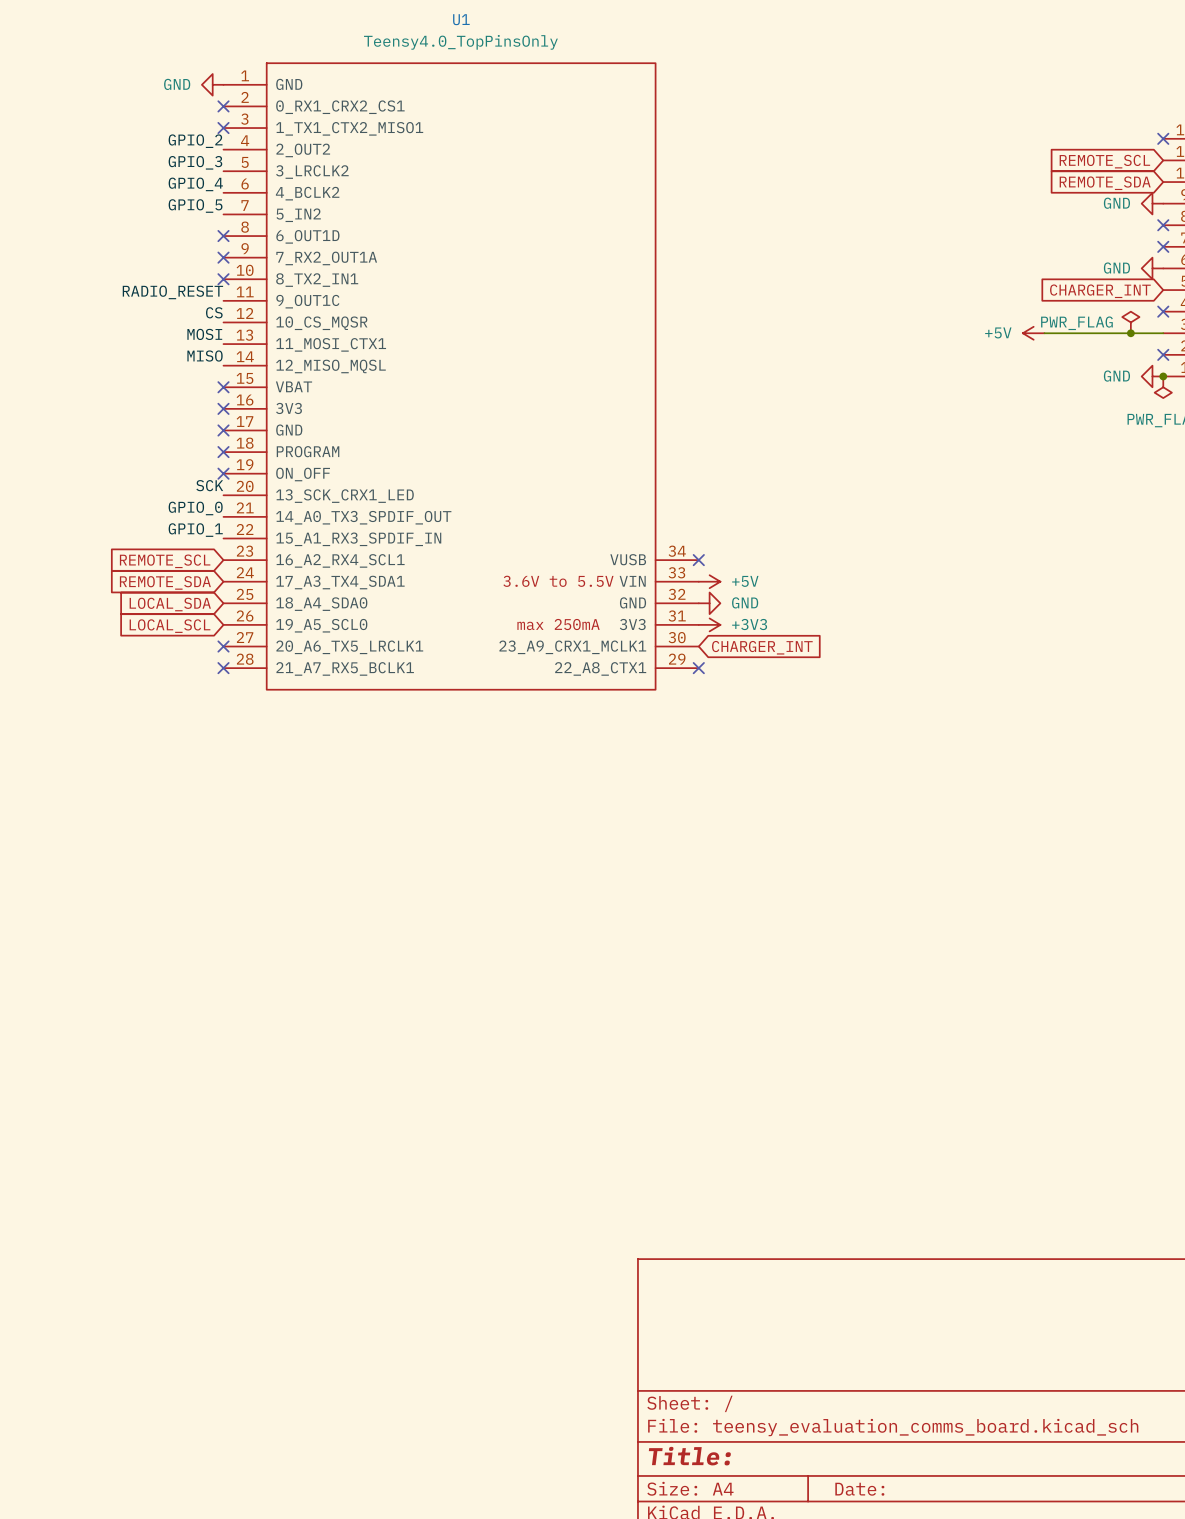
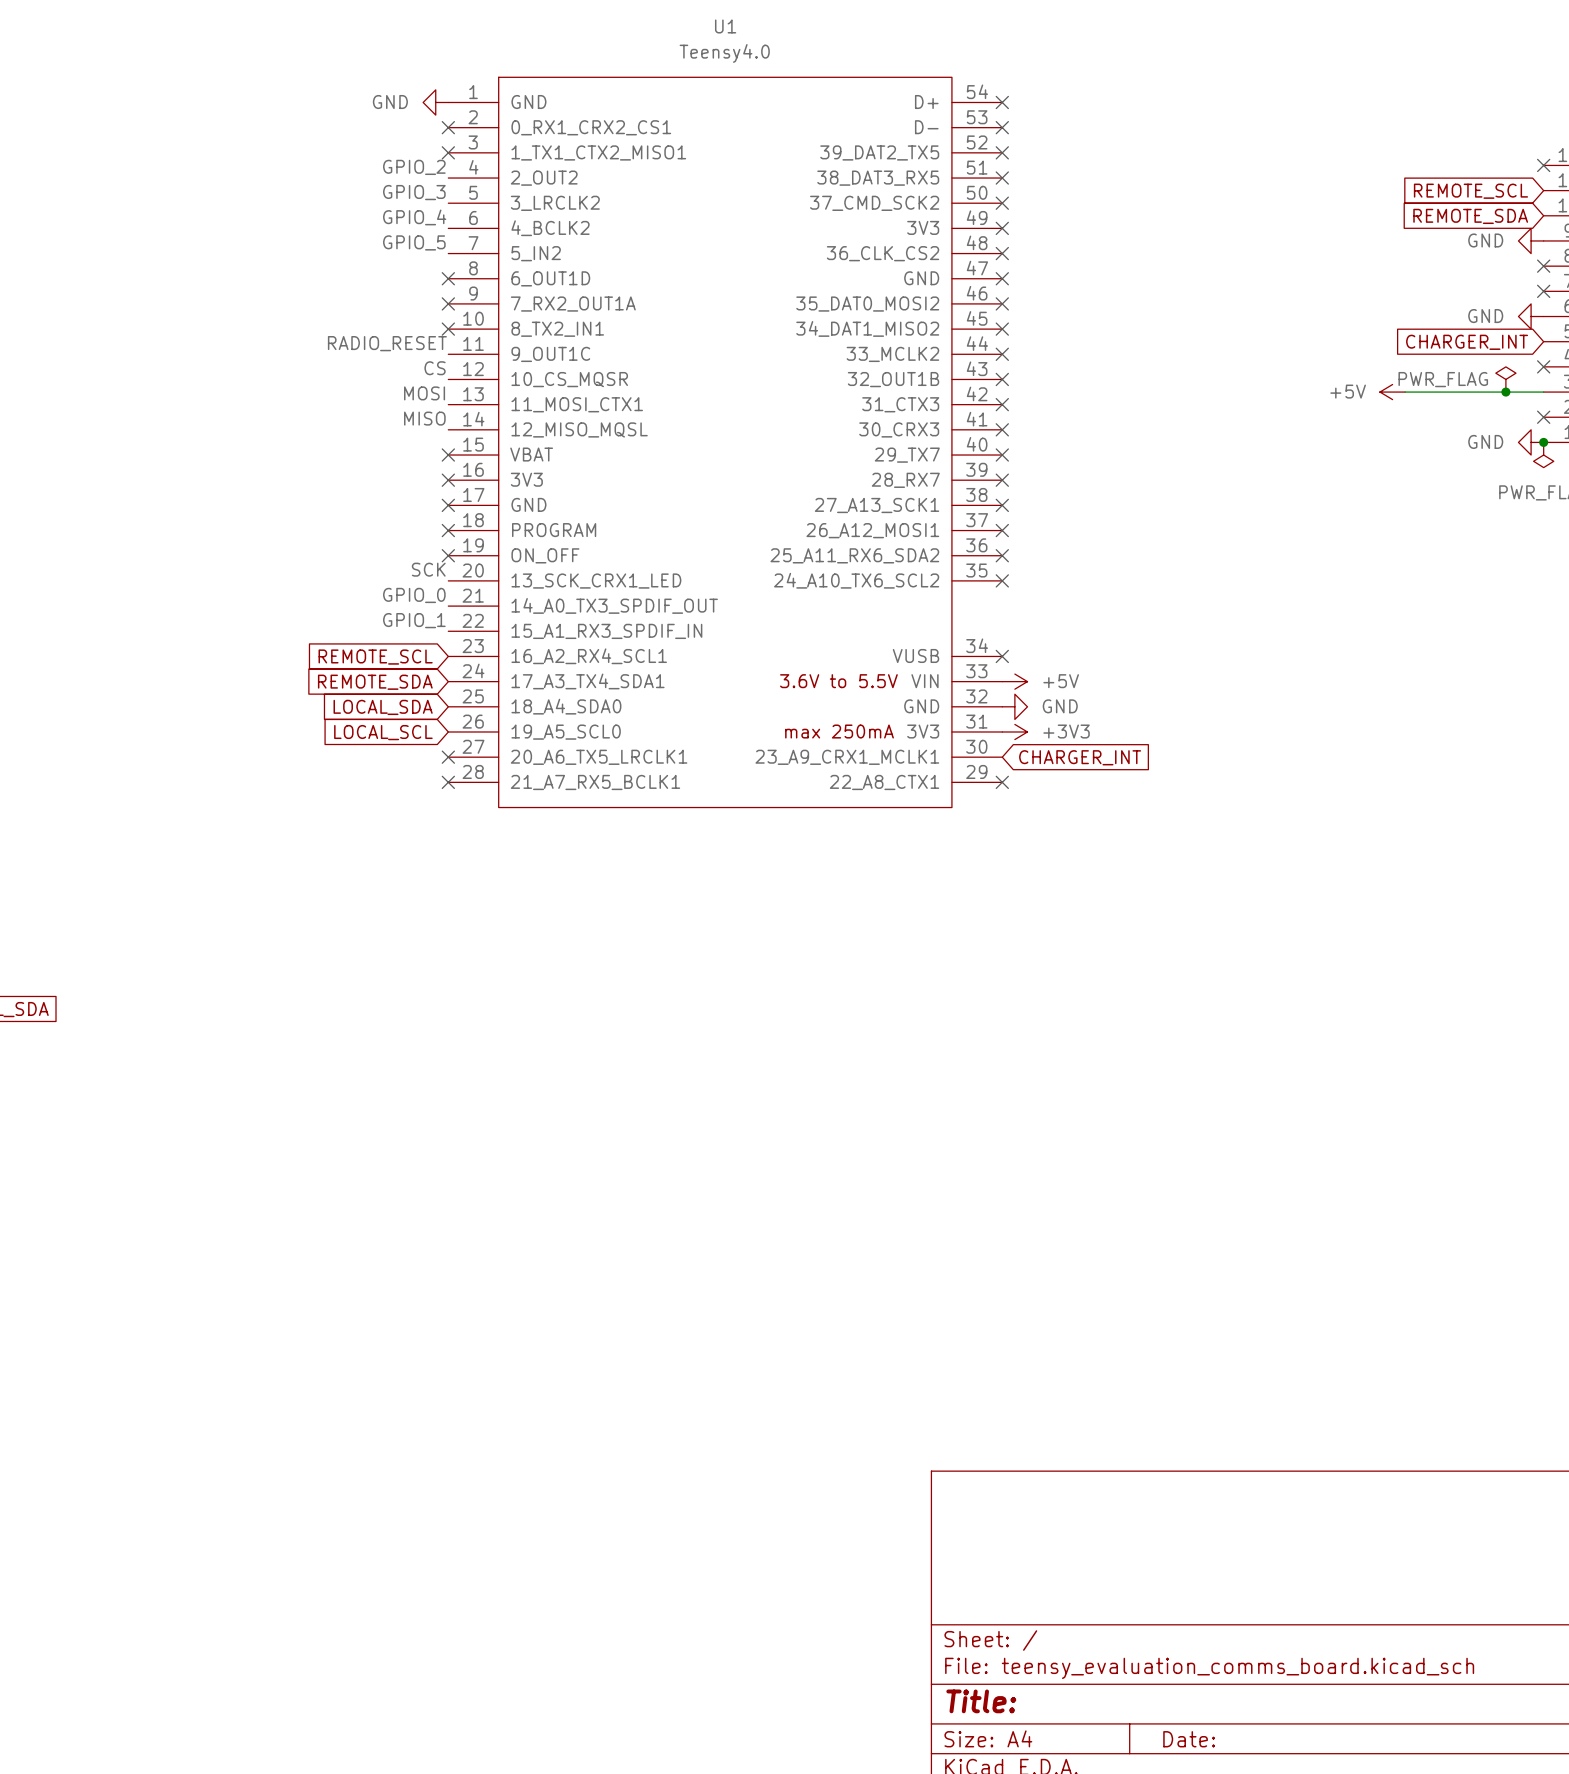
U1 value: Teensy4.0_TopPinsOnly (460, 42) -> Teensy4.0 (724, 53)
U1 symbol: [223, 63, 699, 690] -> [448, 77, 1003, 808]
no-connect mark: none -> (1002, 102)
no-connect mark: none -> (1002, 127)
no-connect mark: none -> (1002, 152)
no-connect mark: none -> (1002, 178)
no-connect mark: none -> (1002, 203)
no-connect mark: none -> (1002, 228)
no-connect mark: none -> (1002, 253)
no-connect mark: none -> (1002, 278)
no-connect mark: none -> (1002, 303)
no-connect mark: none -> (1002, 329)
no-connect mark: none -> (1002, 354)
no-connect mark: none -> (1002, 379)
no-connect mark: none -> (1002, 404)
no-connect mark: none -> (1002, 429)
no-connect mark: none -> (1002, 455)
no-connect mark: none -> (1002, 480)
no-connect mark: none -> (1002, 505)
no-connect mark: none -> (1002, 530)
no-connect mark: none -> (1002, 555)
no-connect mark: none -> (1002, 580)

